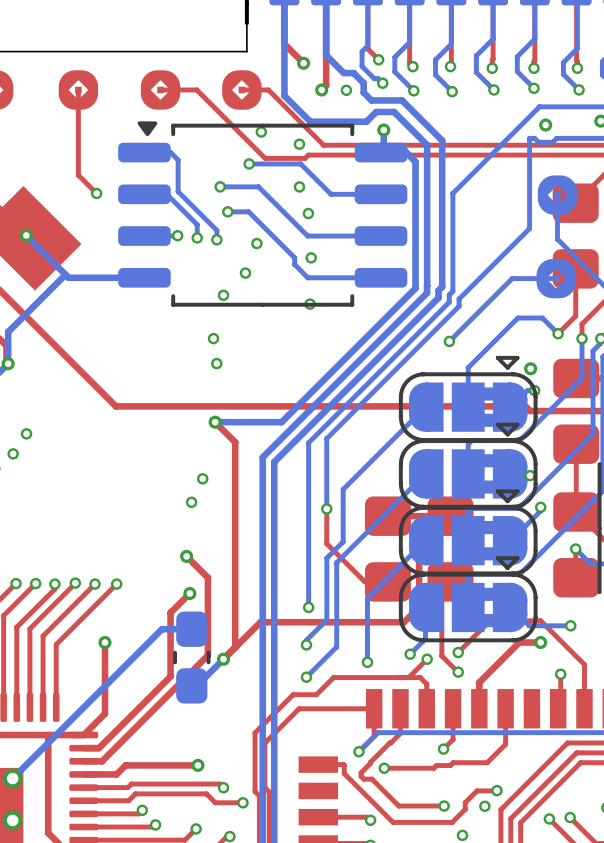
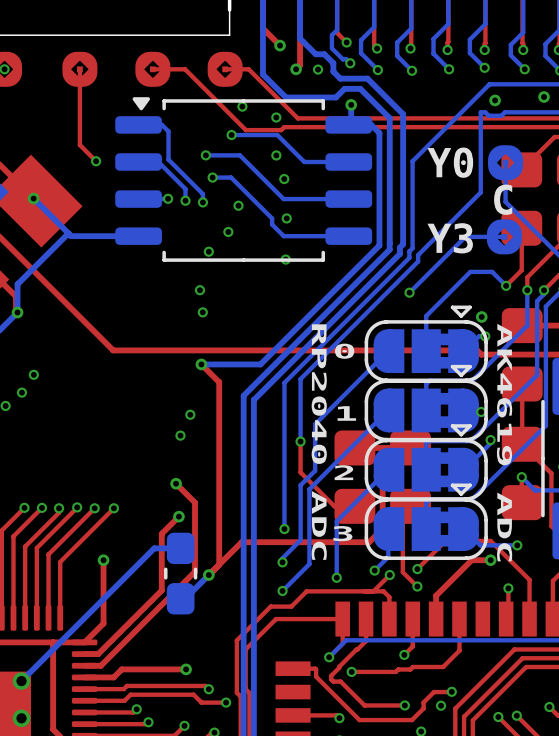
text: none -> Y0 (450, 162)
text: none -> C (503, 199)
text: none -> Y3 (450, 238)
text: none -> 0 (344, 351)
text: none -> 1 (346, 413)
text: none -> AK4619 ADC (504, 442)
text: none -> RP2040 ADC (319, 442)
text: none -> 2 (343, 472)
text: none -> 3 (342, 533)

